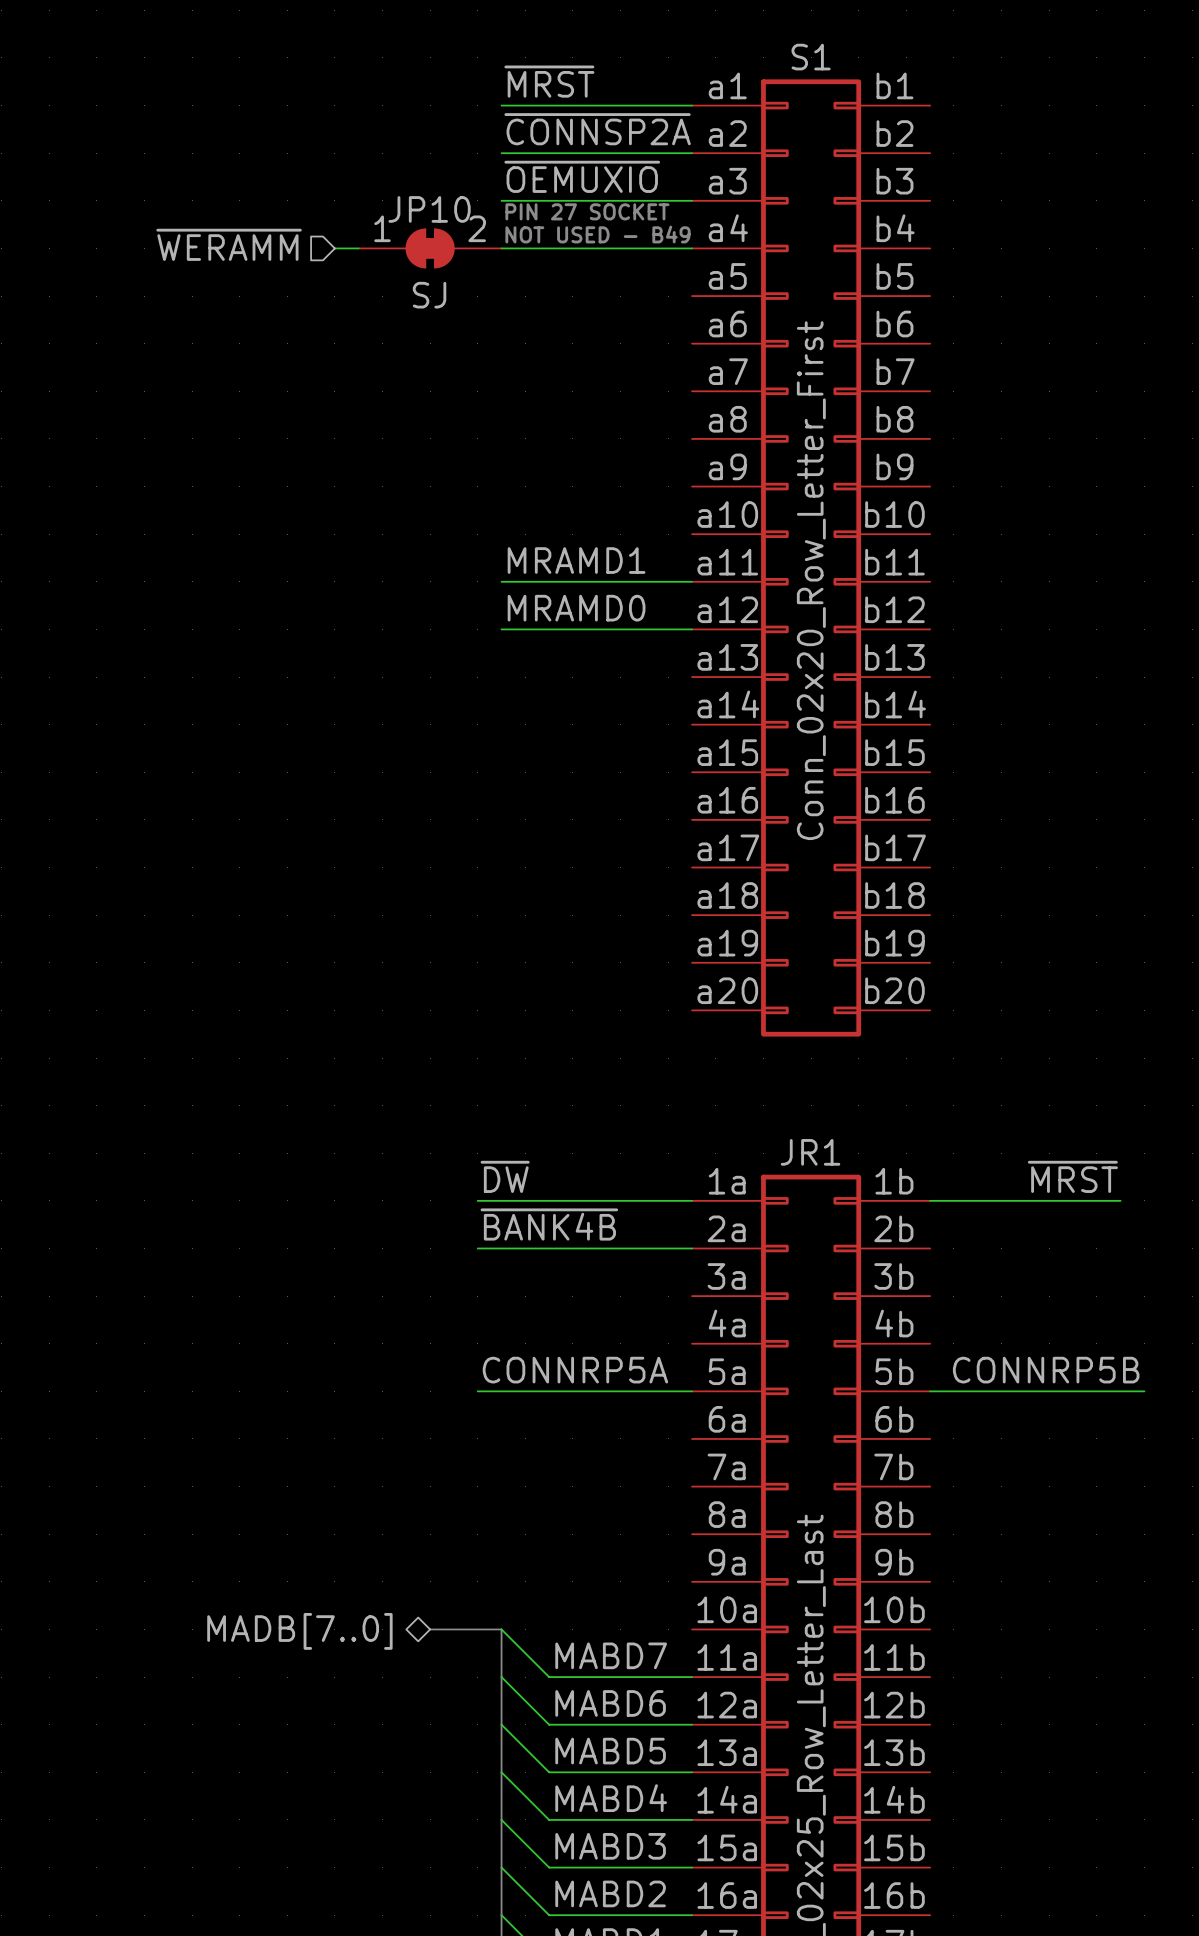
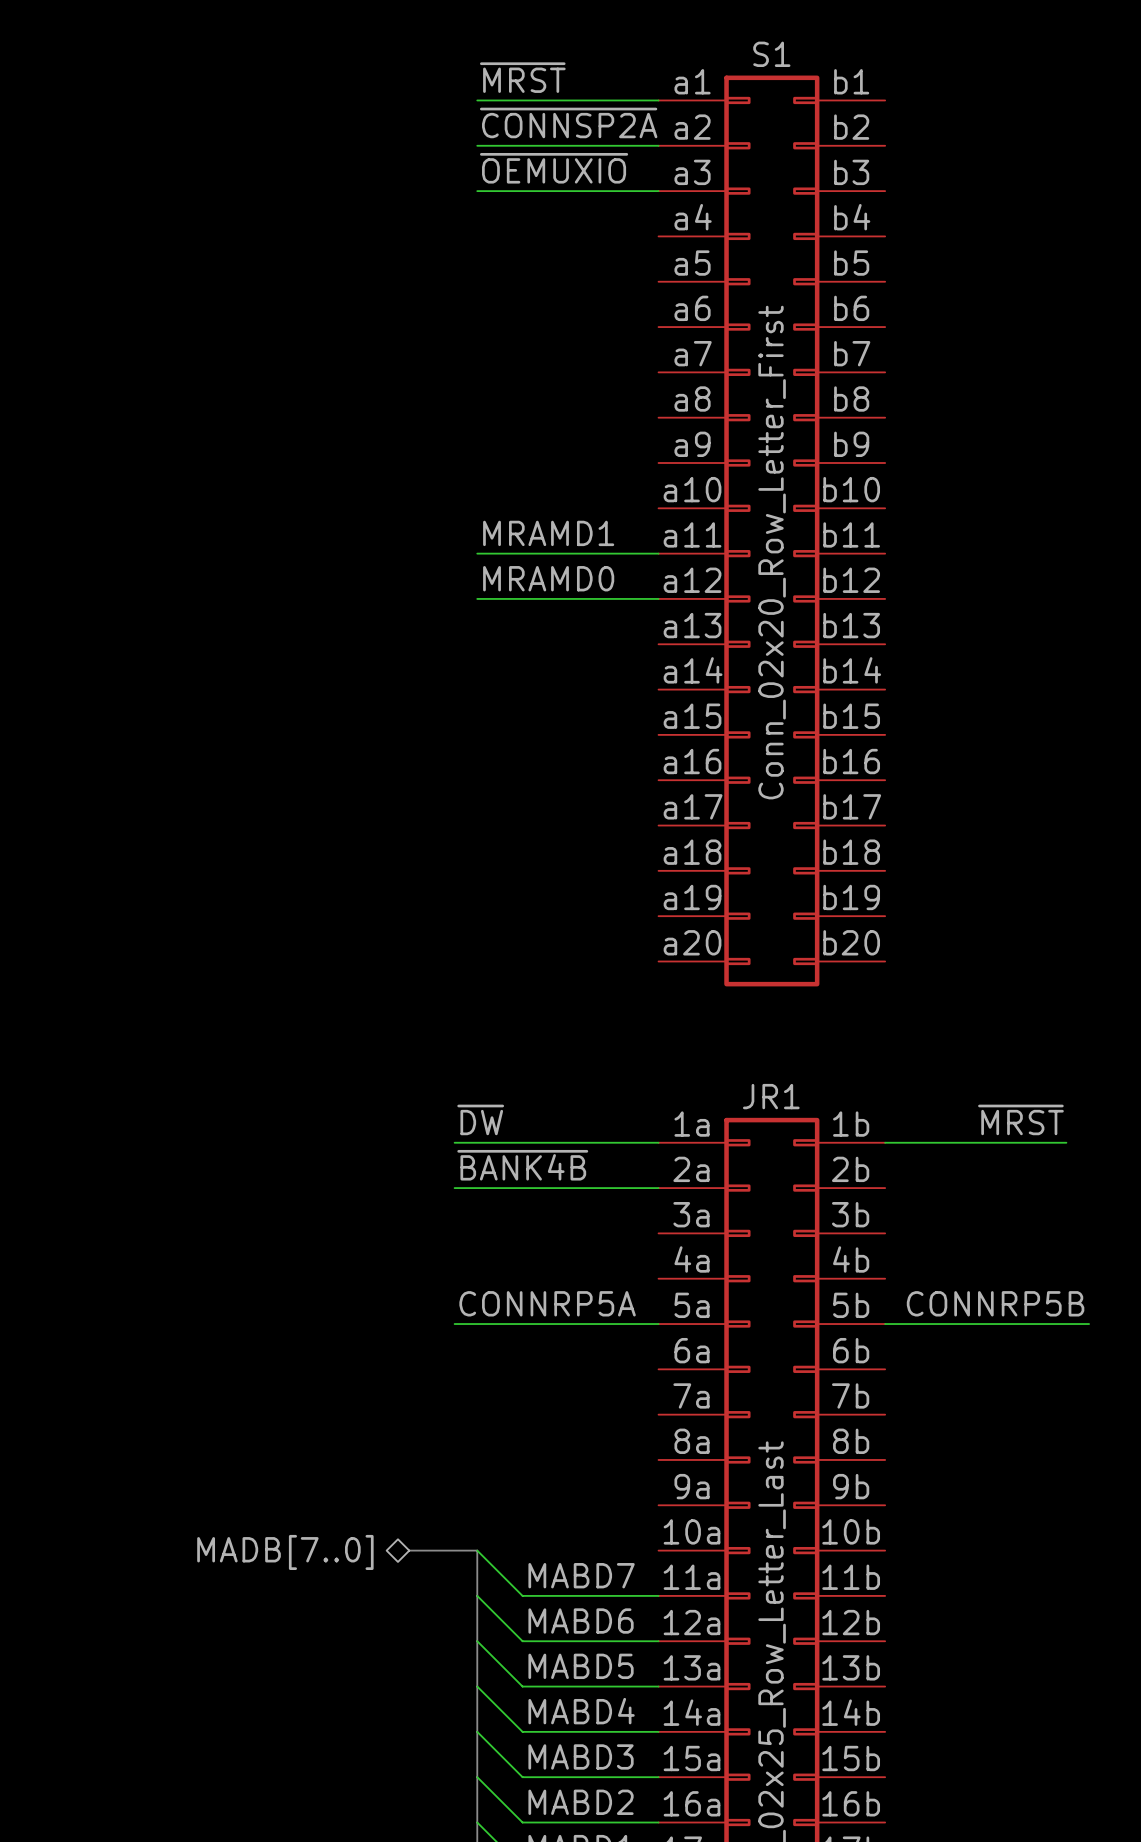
text: PIN 27 SOCKET (587, 211) -> none
text: NOT USED - B49 (597, 234) -> none
hierarchical label: ~{WERAMM} (229, 244) -> none
wire: (334, 248) (358, 248) -> none
JP10: SJ (430, 248) -> none
wire: (501, 248) (692, 248) -> none

